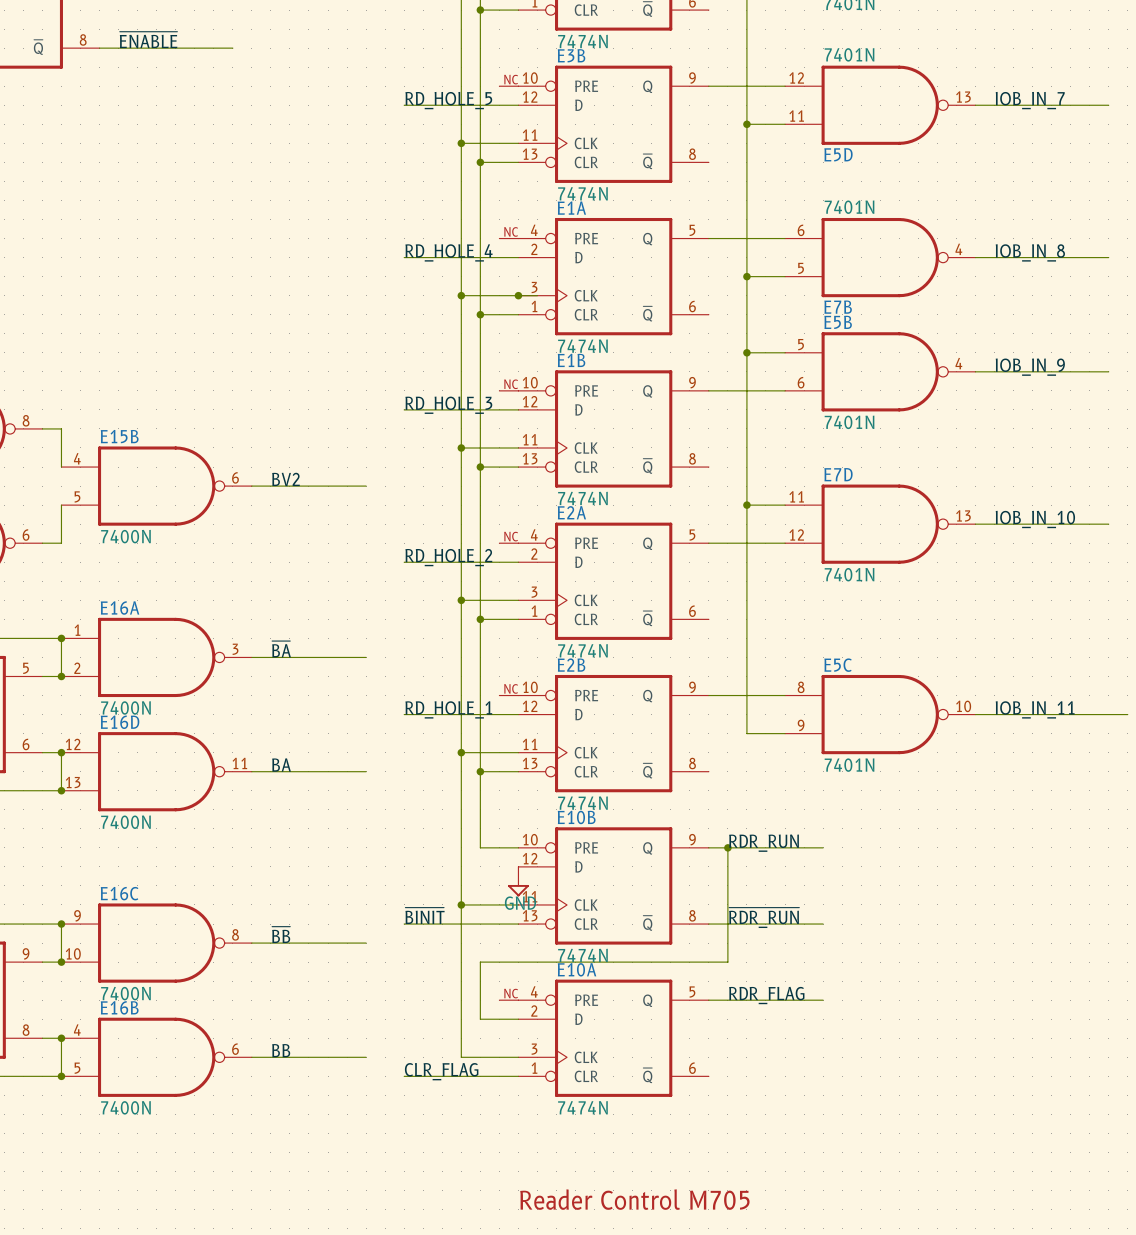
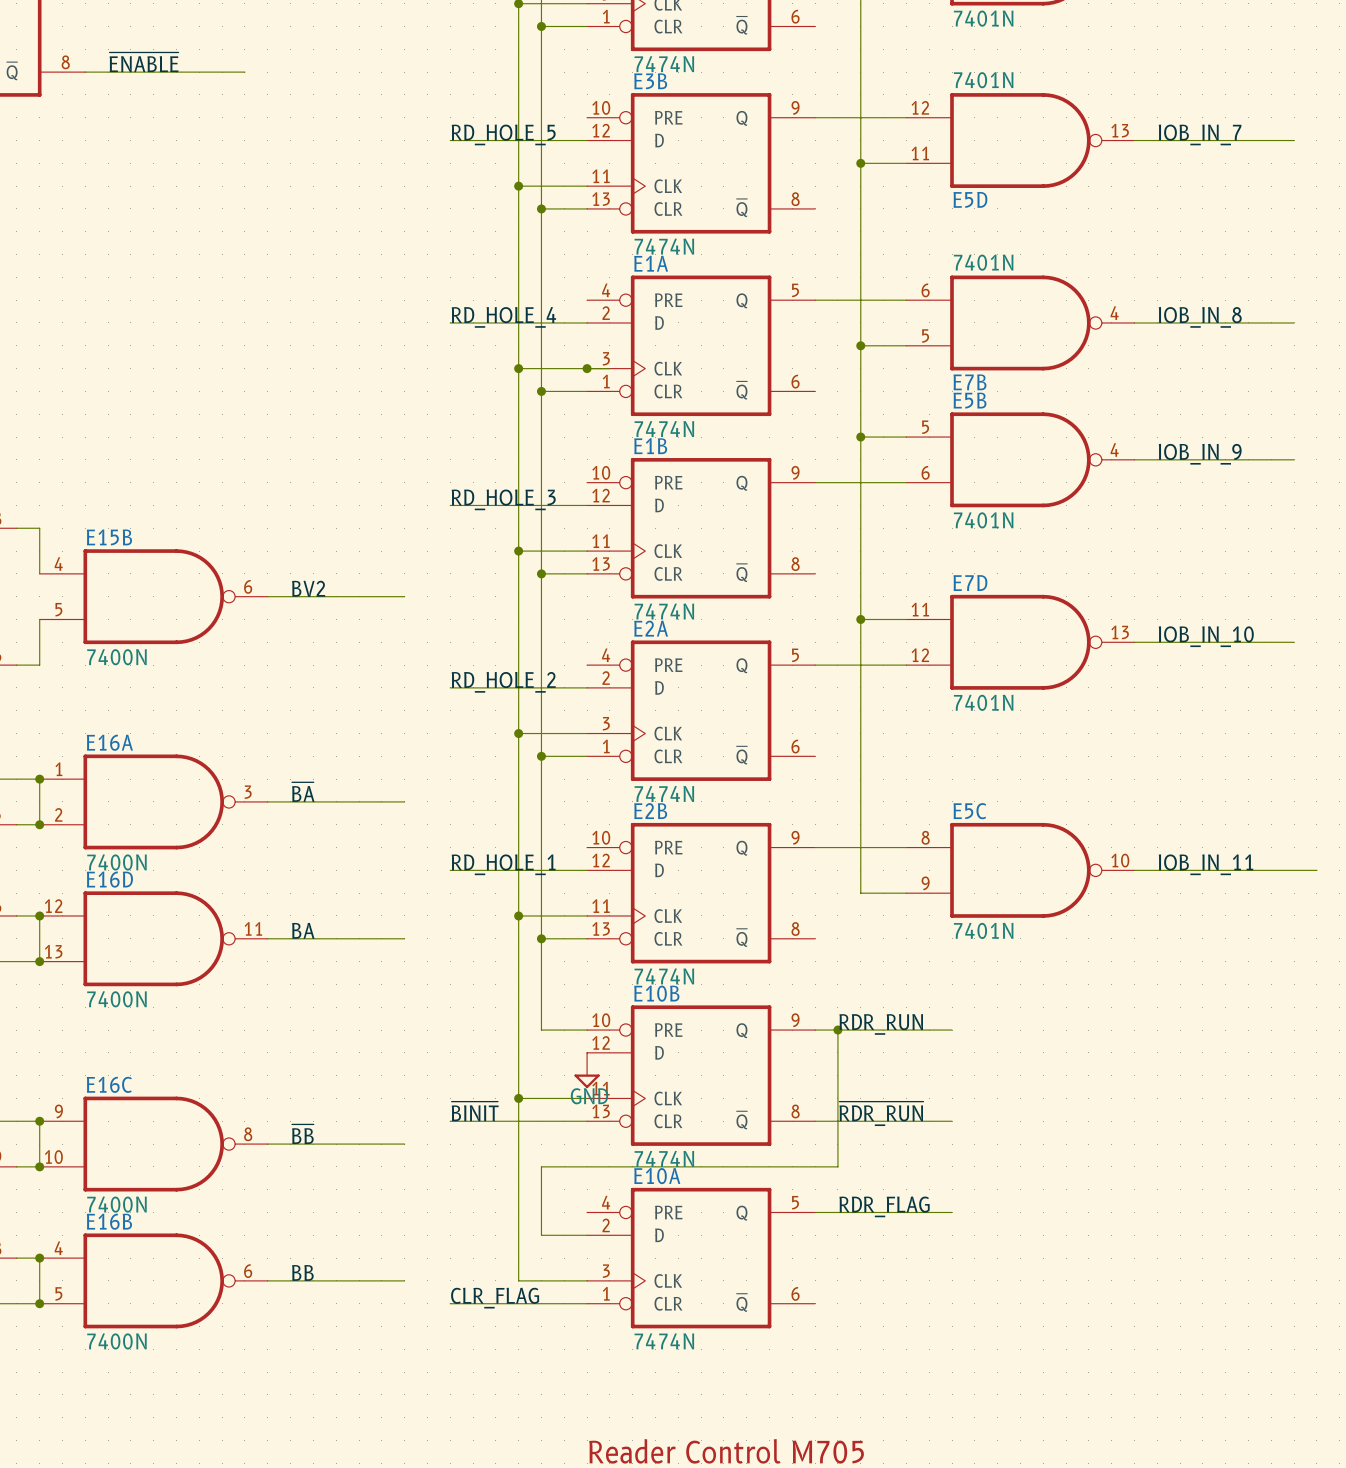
power symbol: (508, 86) -> none
power symbol: (508, 238) -> none
power symbol: (508, 390) -> none
power symbol: (508, 543) -> none
power symbol: (508, 695) -> none
power symbol: (508, 1000) -> none

